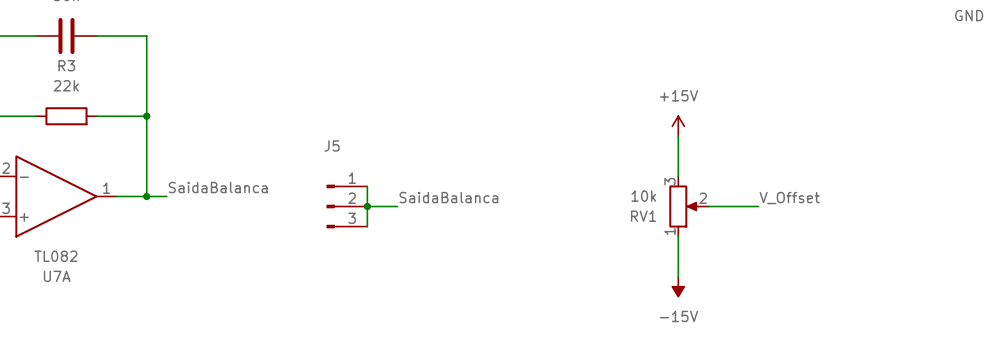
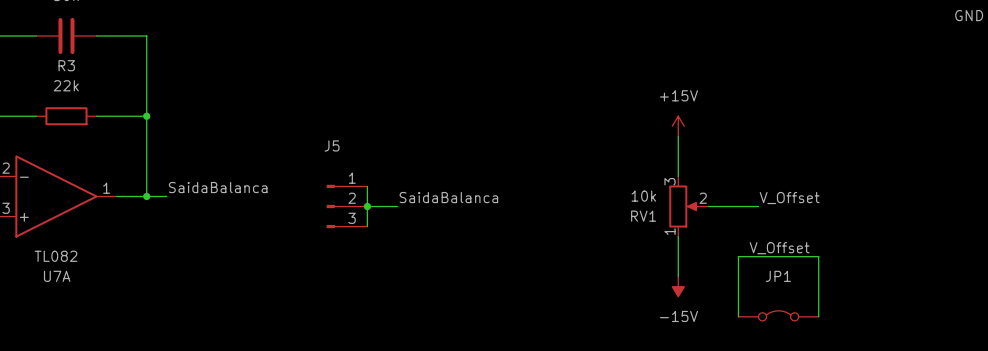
label: none -> V_Offset (779, 248)
JP1: none -> (778, 315)
wire: none -> (738, 316) (738, 256) (818, 256) (818, 316)

